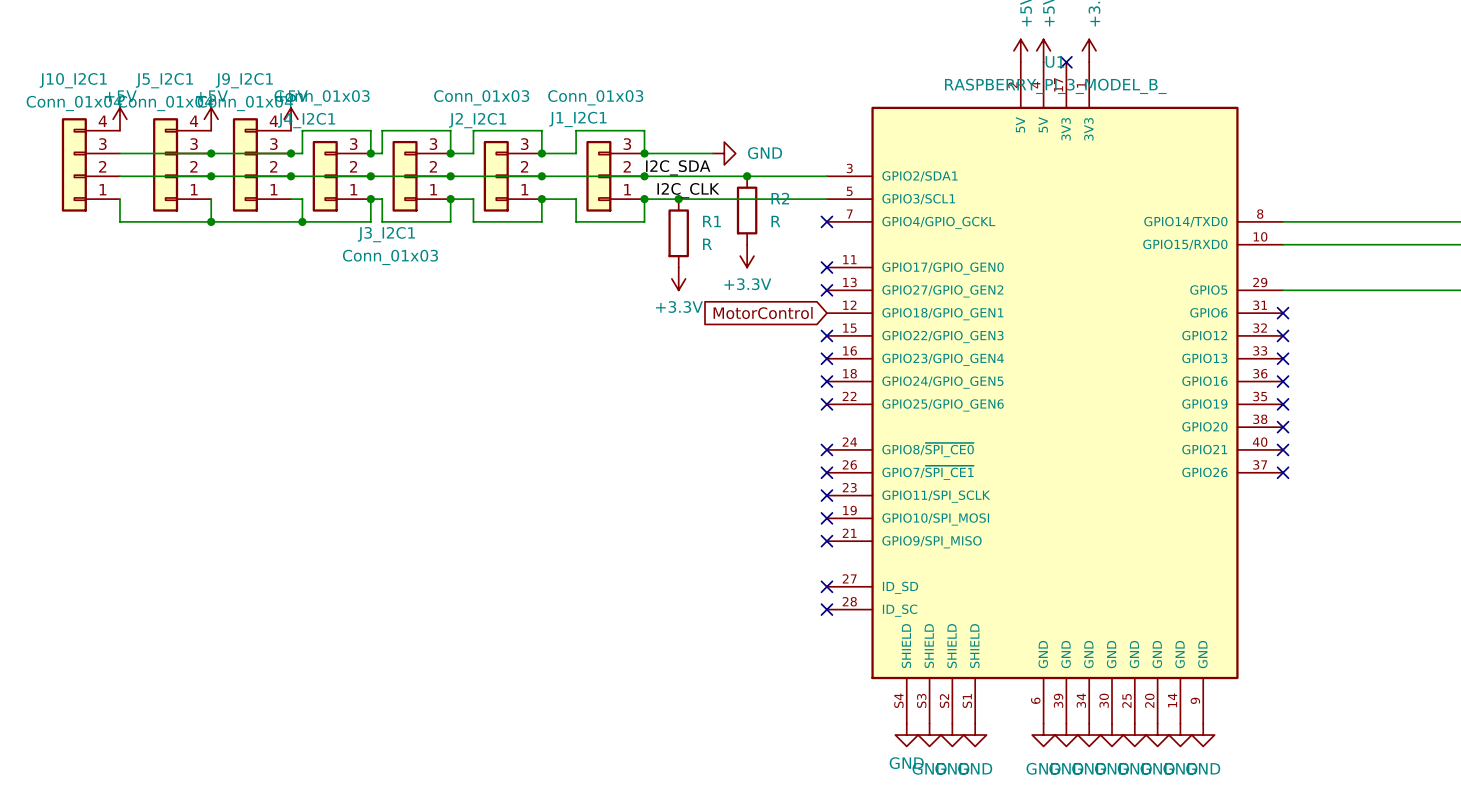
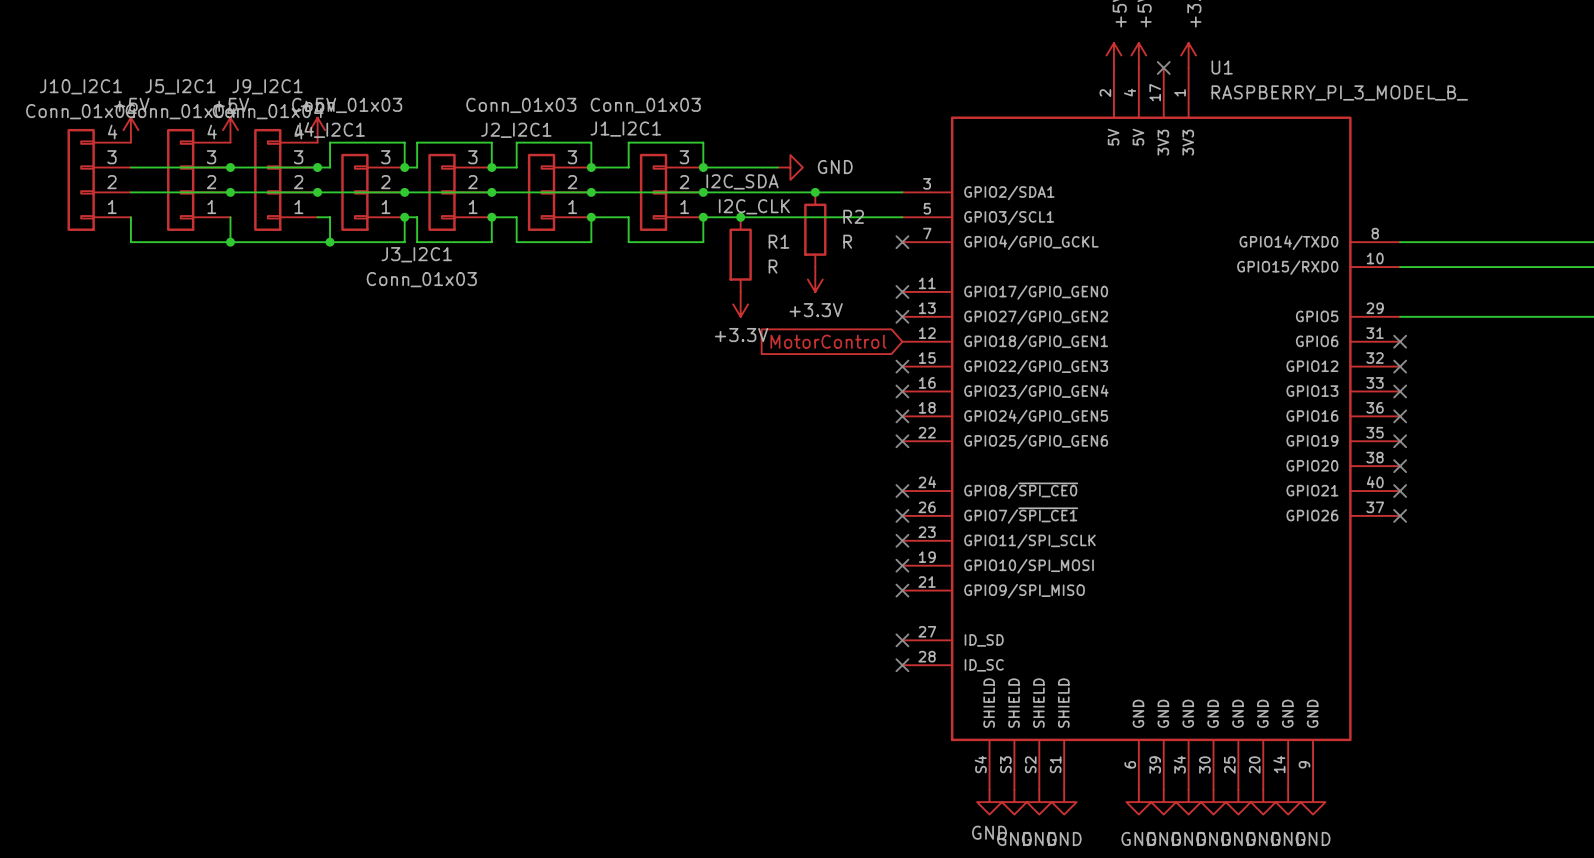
U1 name position: U1 (1054, 61) -> U1 (1222, 67)
U1 value position: RASPBERRY_PI_3_MODEL_B_ (1055, 86) -> RASPBERRY_PI_3_MODEL_B_ (1339, 92)

